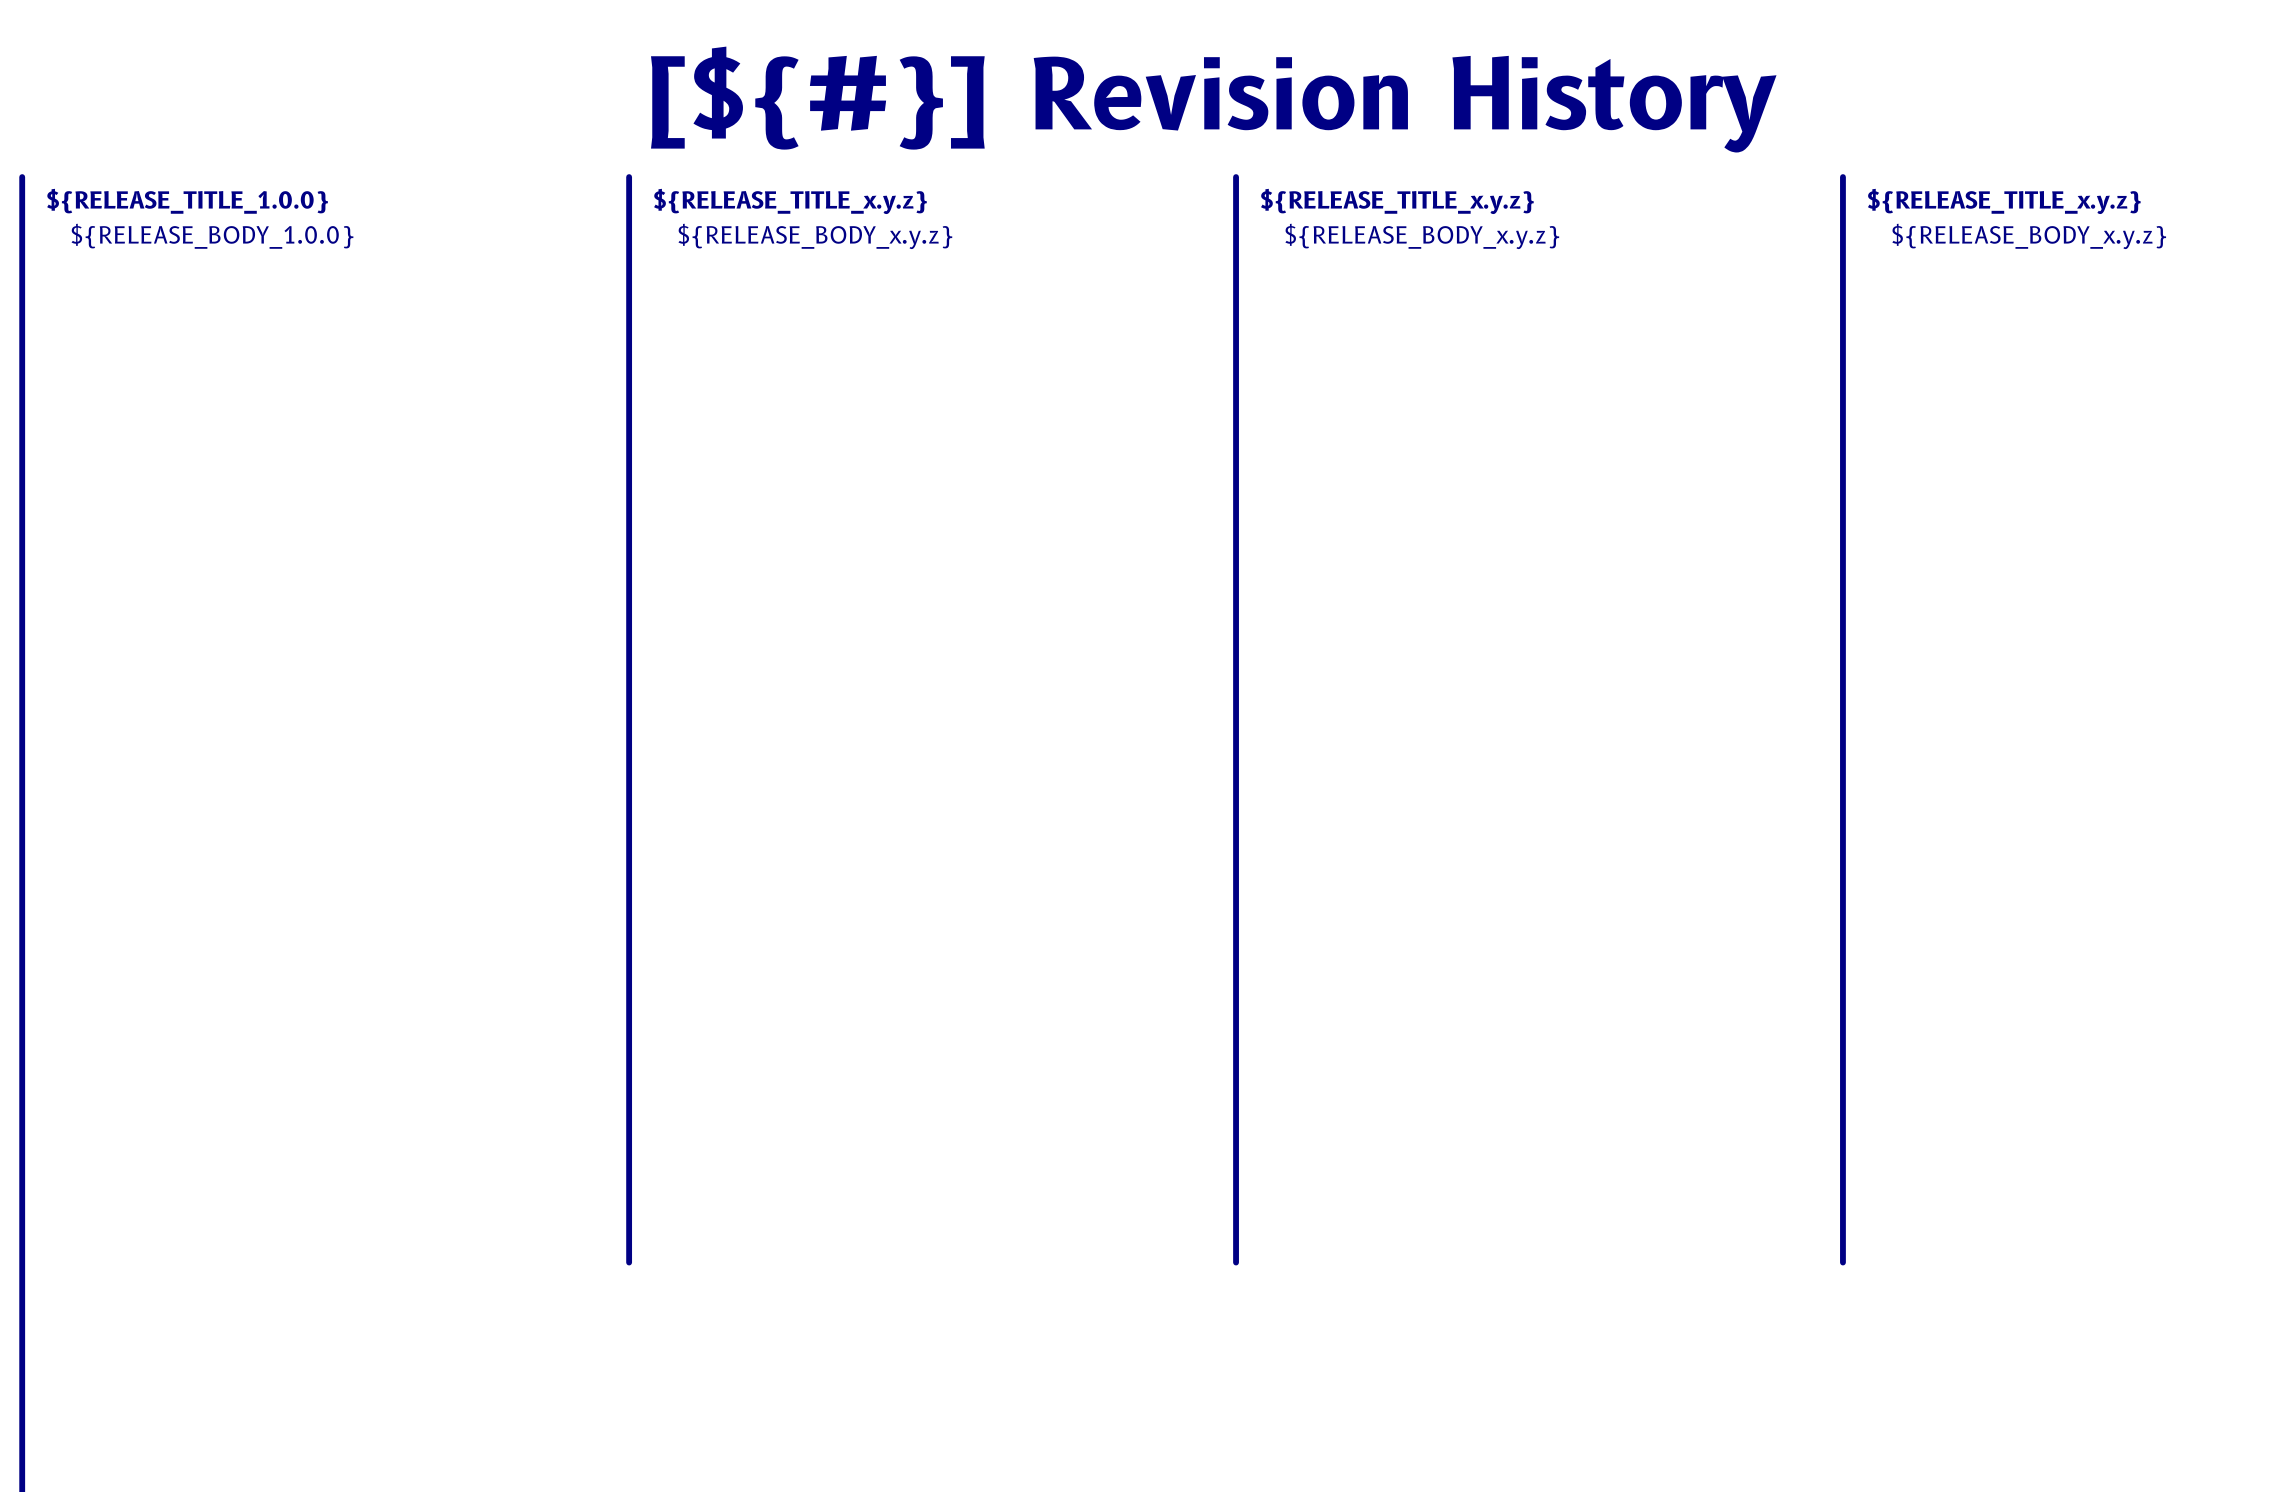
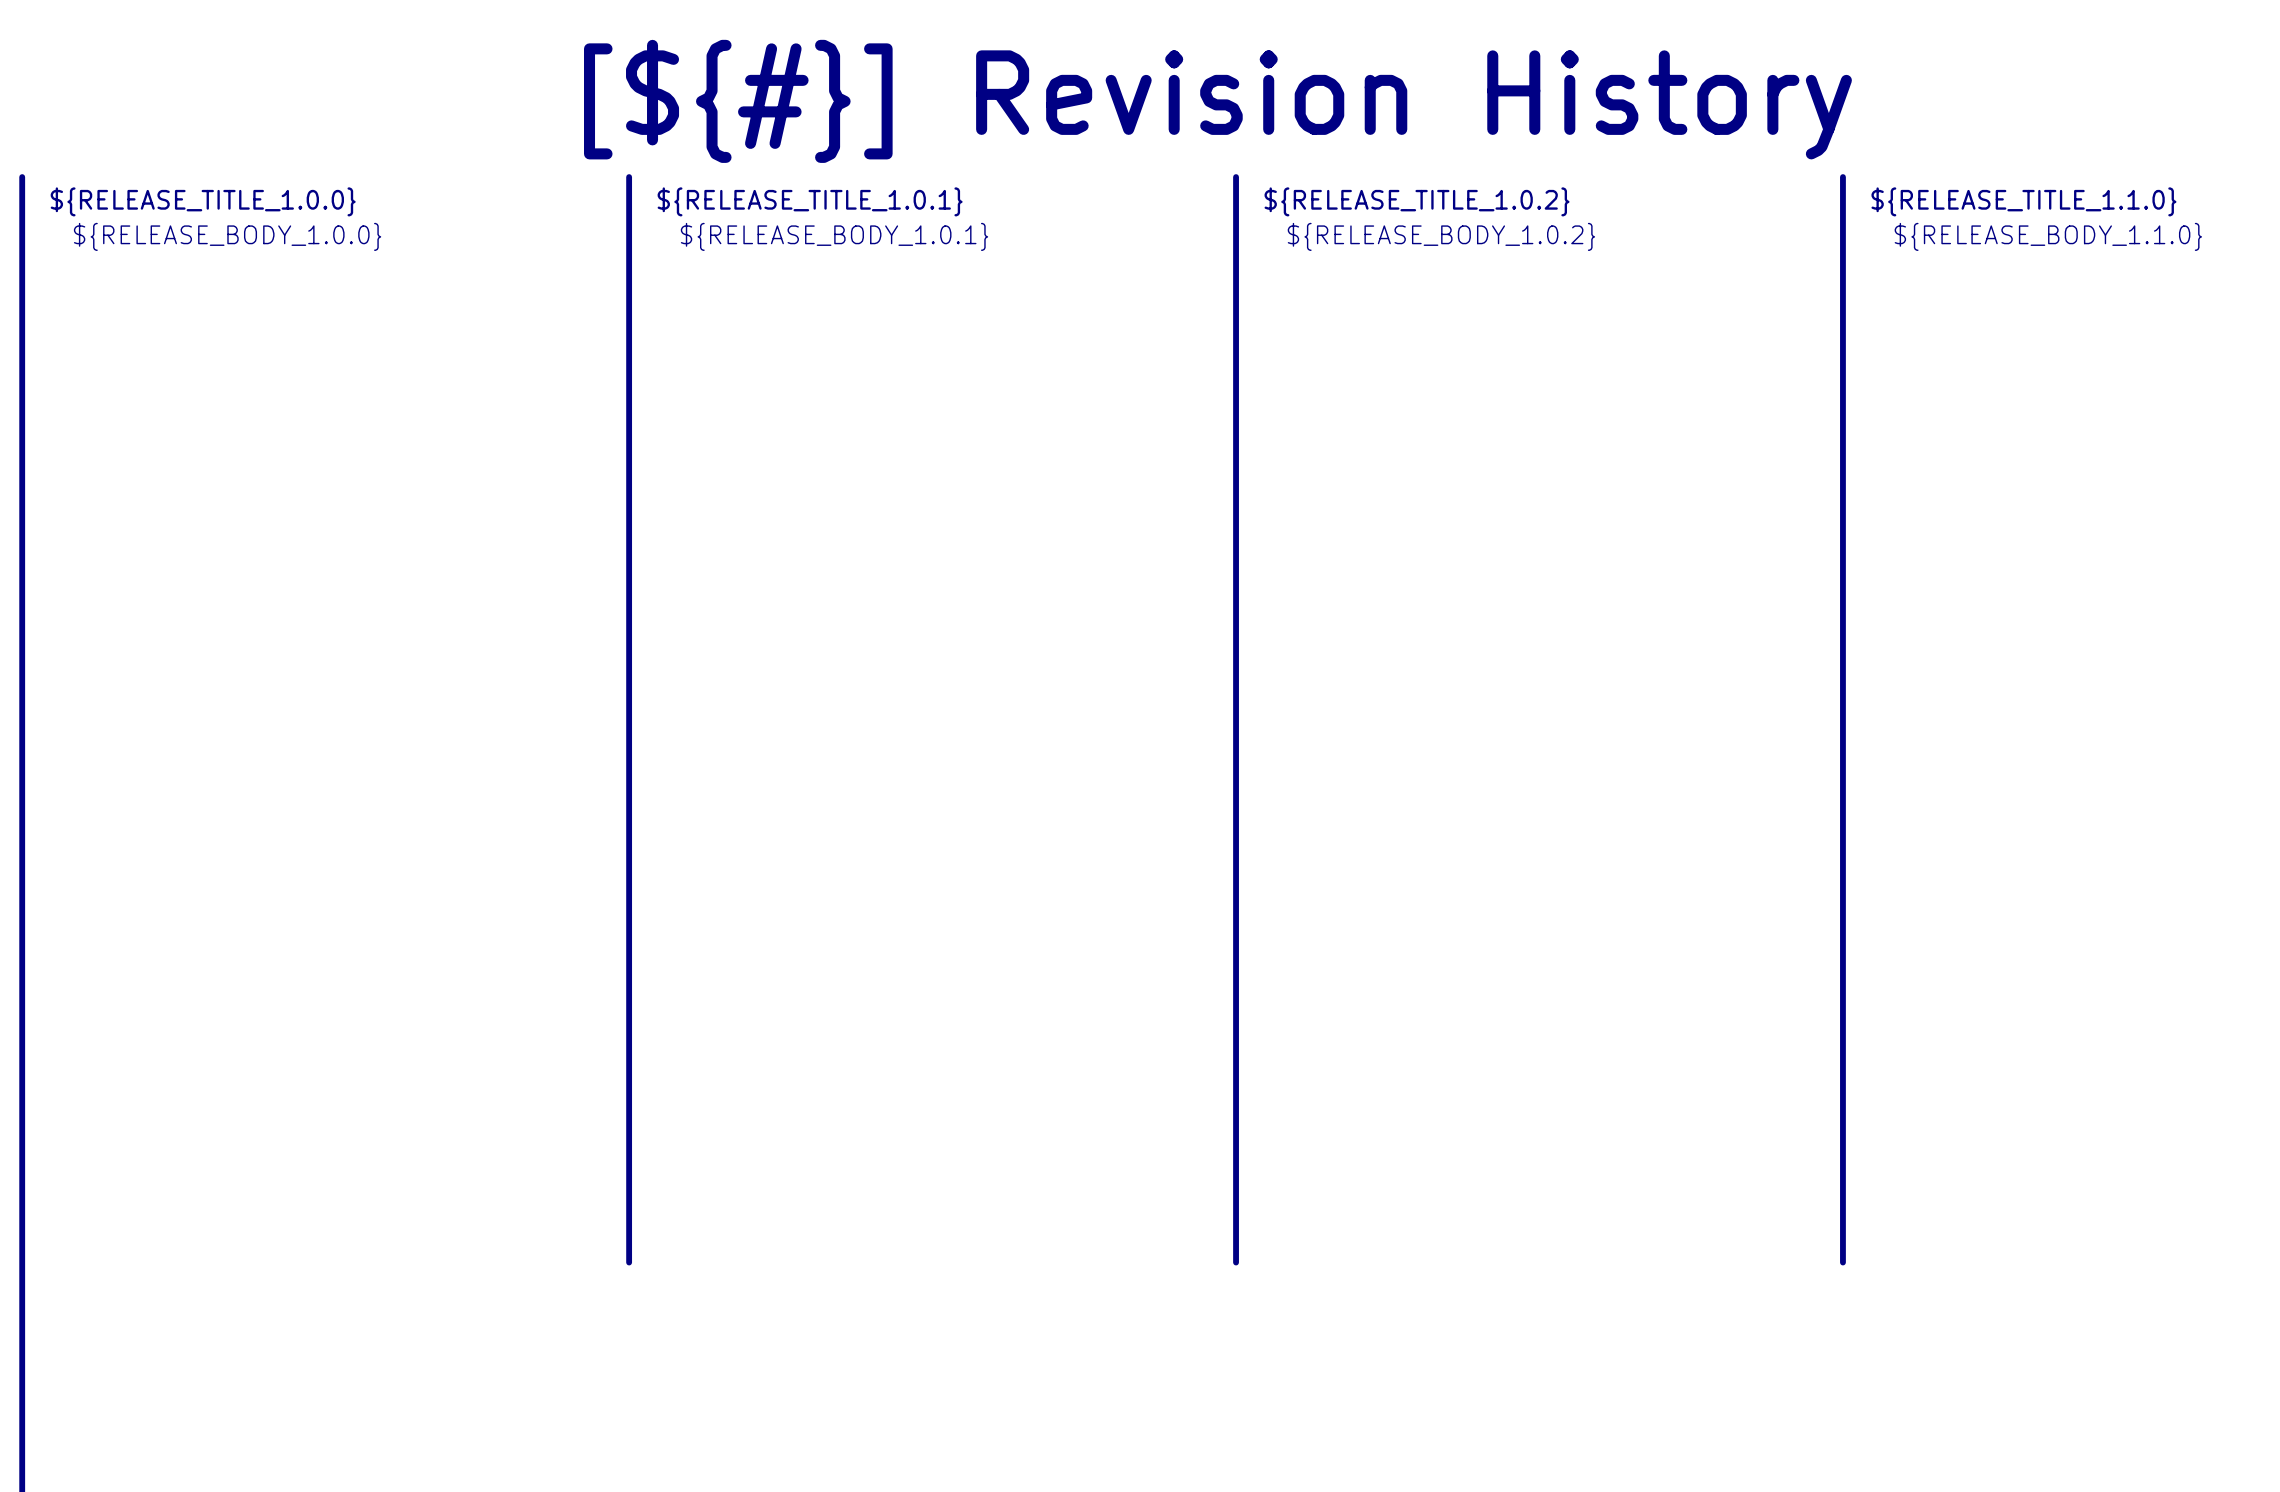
text: ${RELEASE_TITLE_x.y.z} (790, 201) -> ${RELEASE_TITLE_1.0.1} (810, 201)
text: ${RELEASE_TITLE_x.y.z} (1397, 201) -> ${RELEASE_TITLE_1.0.2} (1417, 201)
text: ${RELEASE_TITLE_x.y.z} (2004, 201) -> ${RELEASE_TITLE_1.1.0} (2023, 201)
text: ${RELEASE_BODY_x.y.z} (815, 236) -> ${RELEASE_BODY_1.0.1} (834, 236)
text: ${RELEASE_BODY_x.y.z} (1422, 236) -> ${RELEASE_BODY_1.0.2} (1441, 236)
text: ${RELEASE_BODY_x.y.z} (2029, 236) -> ${RELEASE_BODY_1.1.0} (2048, 236)

